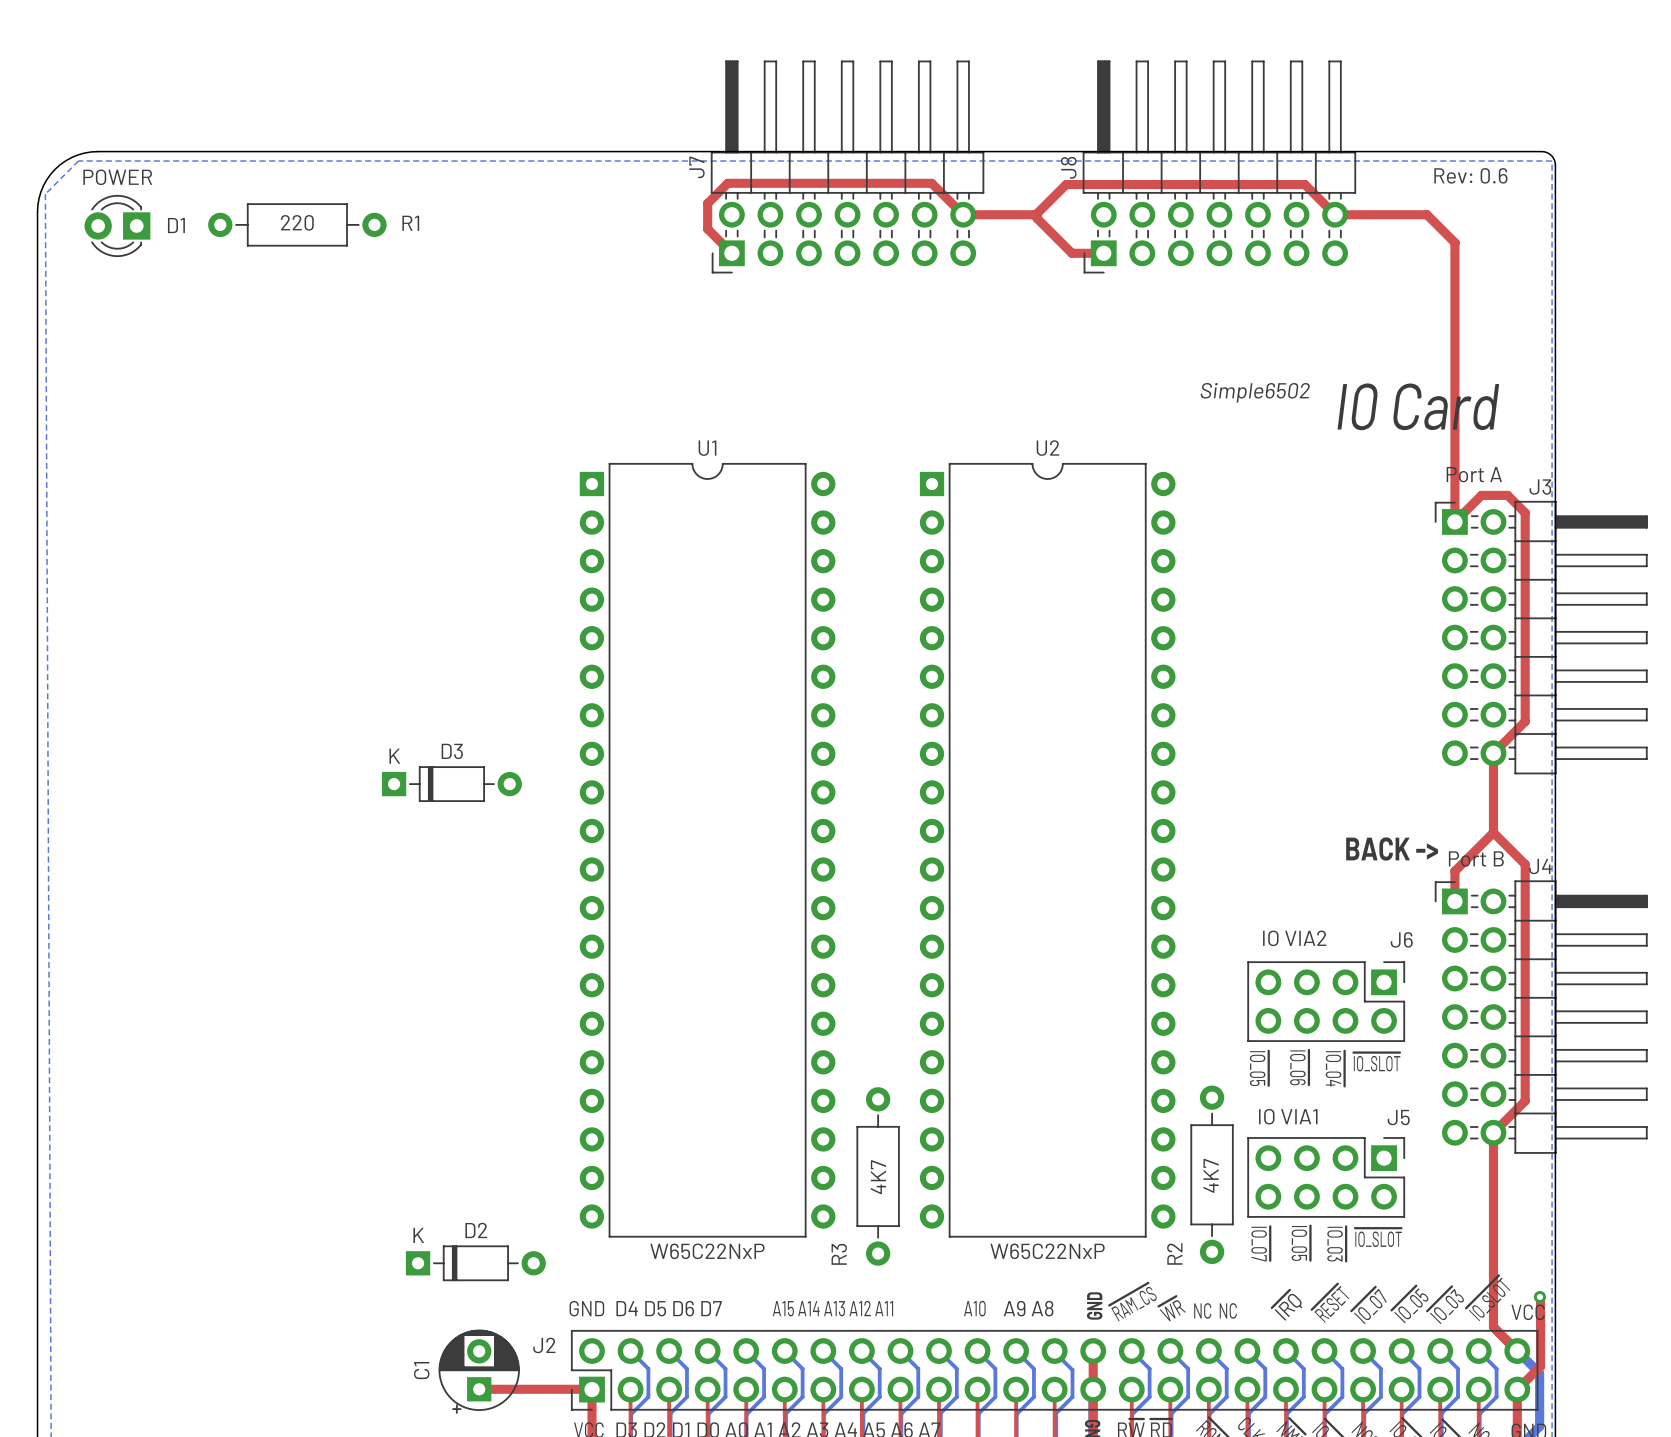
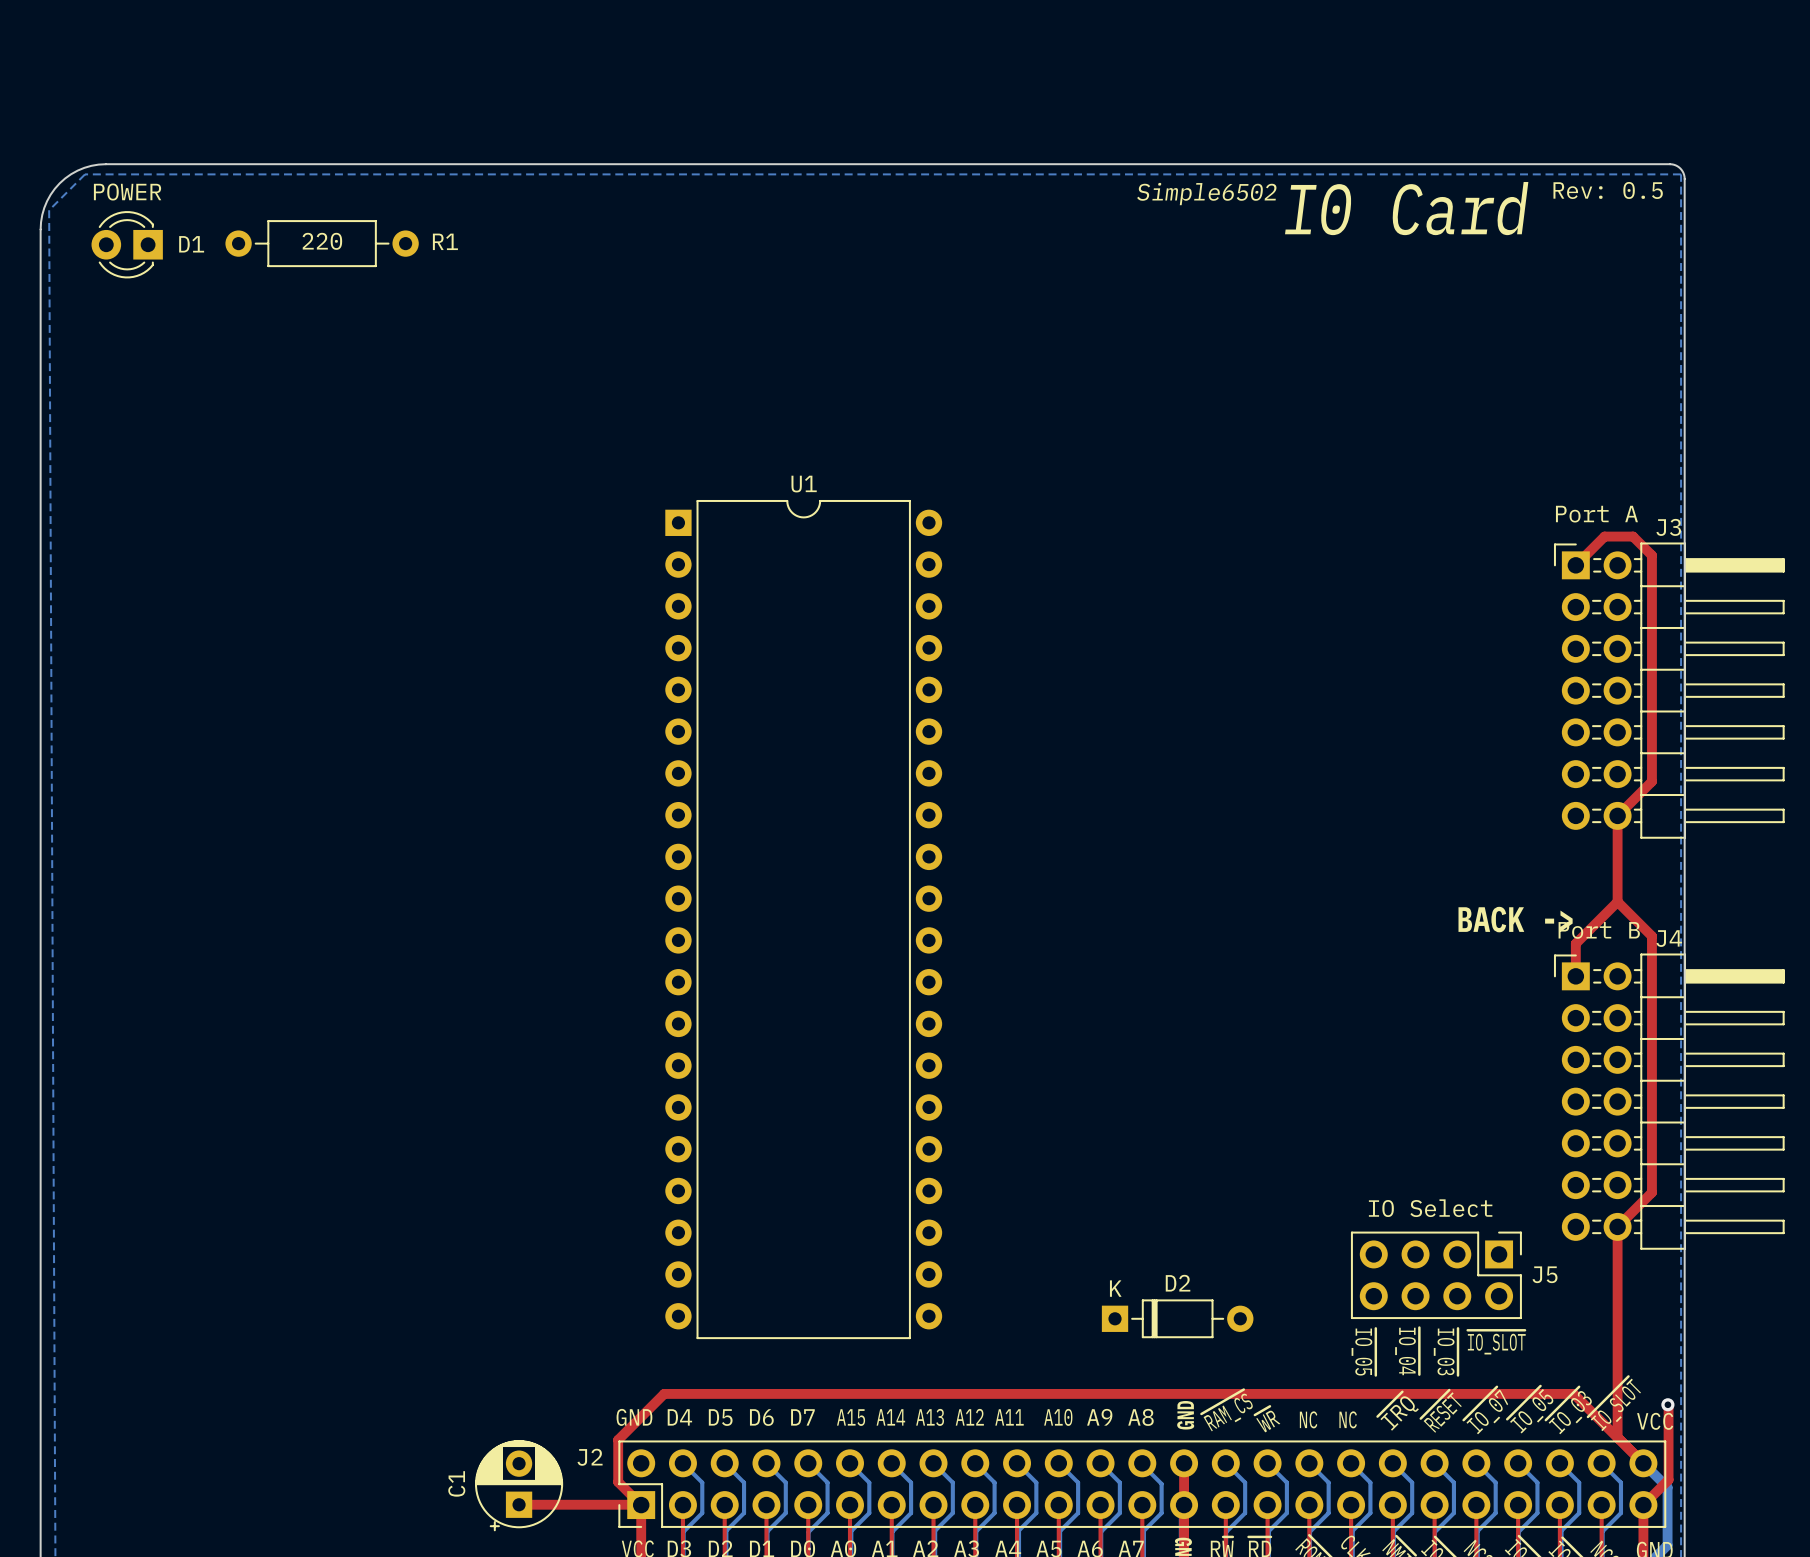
J7: (847, 167) -> none
J8: (1219, 167) -> none
text: Rev: 0.6 (1470, 175) -> Rev: 0.5 (1608, 190)
top track: (1037, 213) (1037, 218) (1071, 253) (1103, 253) -> none
top track: (731, 253) (707, 229) (707, 203) (727, 183) (931, 183) (963, 214) (1035, 214) (1066, 184) (1304, 184) (1335, 214) (1426, 214) (1455, 242) (1454, 521) -> none
text position: Simple6502 (1255, 392) -> Simple6502 (1206, 194)
text position: I0 Card (1418, 406) -> I0 Card (1406, 208)
D3: (451, 784) -> none
U1 position: (707, 850) -> (803, 919)
U2: W65C22NxP (1047, 850) -> none
J6: IO VIA2 (1326, 1001) -> none
text: ~{IO_SLOT} (1376, 1061) -> none
text: ~{IO_06} (1299, 1067) -> none
text: ~{IO_05} (1259, 1068) -> none
text: ~{IO_04} (1335, 1068) -> none
J5 value: IO VIA1 (1288, 1116) -> IO Select (1430, 1208)
J5 name position: J5 (1398, 1117) -> J5 (1545, 1274)
R2: 4K7 (1212, 1174) -> none
R3: 4K7 (878, 1176) -> none
text: ~{IO_07} (1260, 1243) -> ~{IO_05} (1363, 1351)
text: ~{IO_05} (1301, 1243) -> ~{IO_04} (1407, 1351)
U1 value: W65C22NxP (707, 1251) -> none
D2 position: (475, 1263) -> (1177, 1318)
top track: none -> (1619, 1439) (1573, 1393) (664, 1393) (618, 1439) (618, 1482) (640, 1504)

